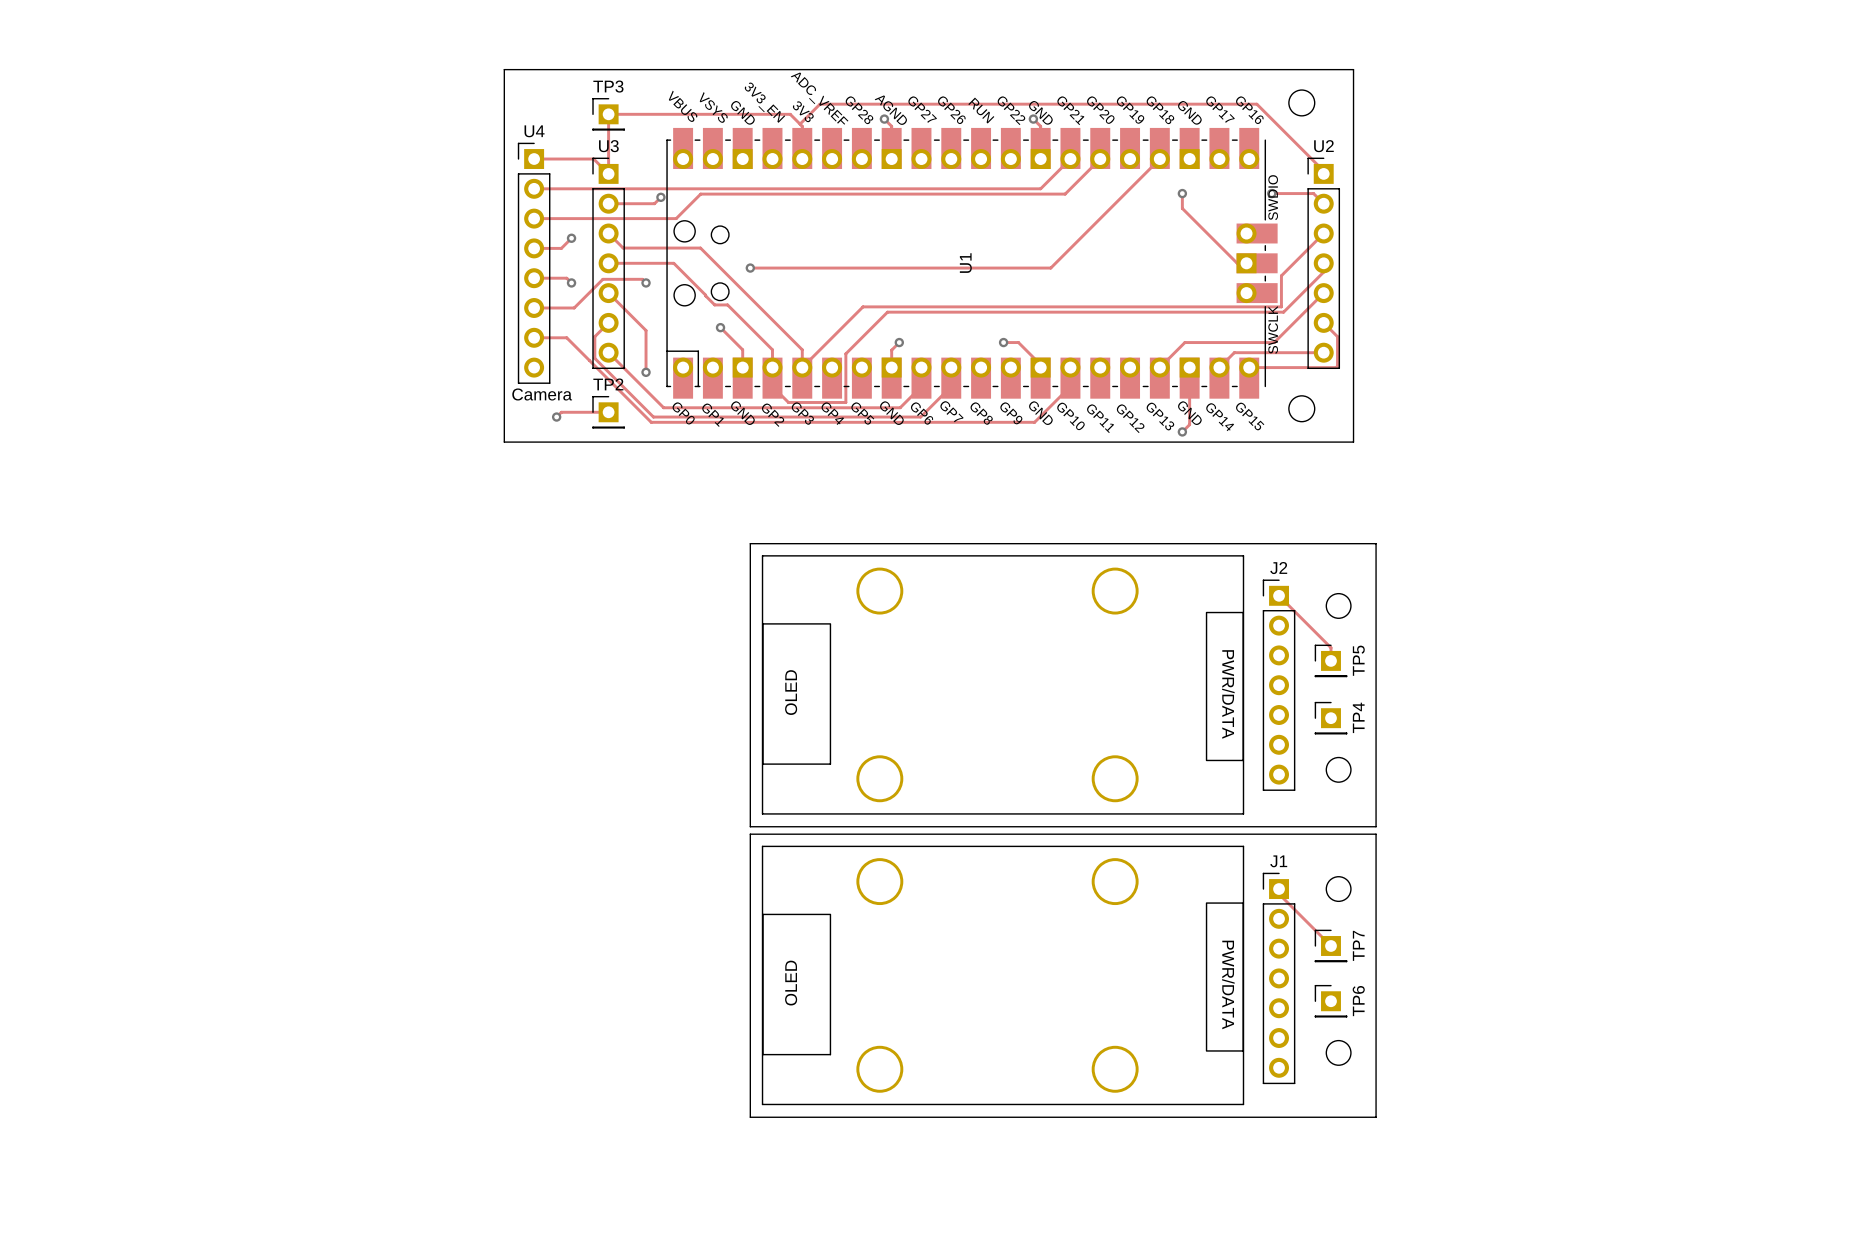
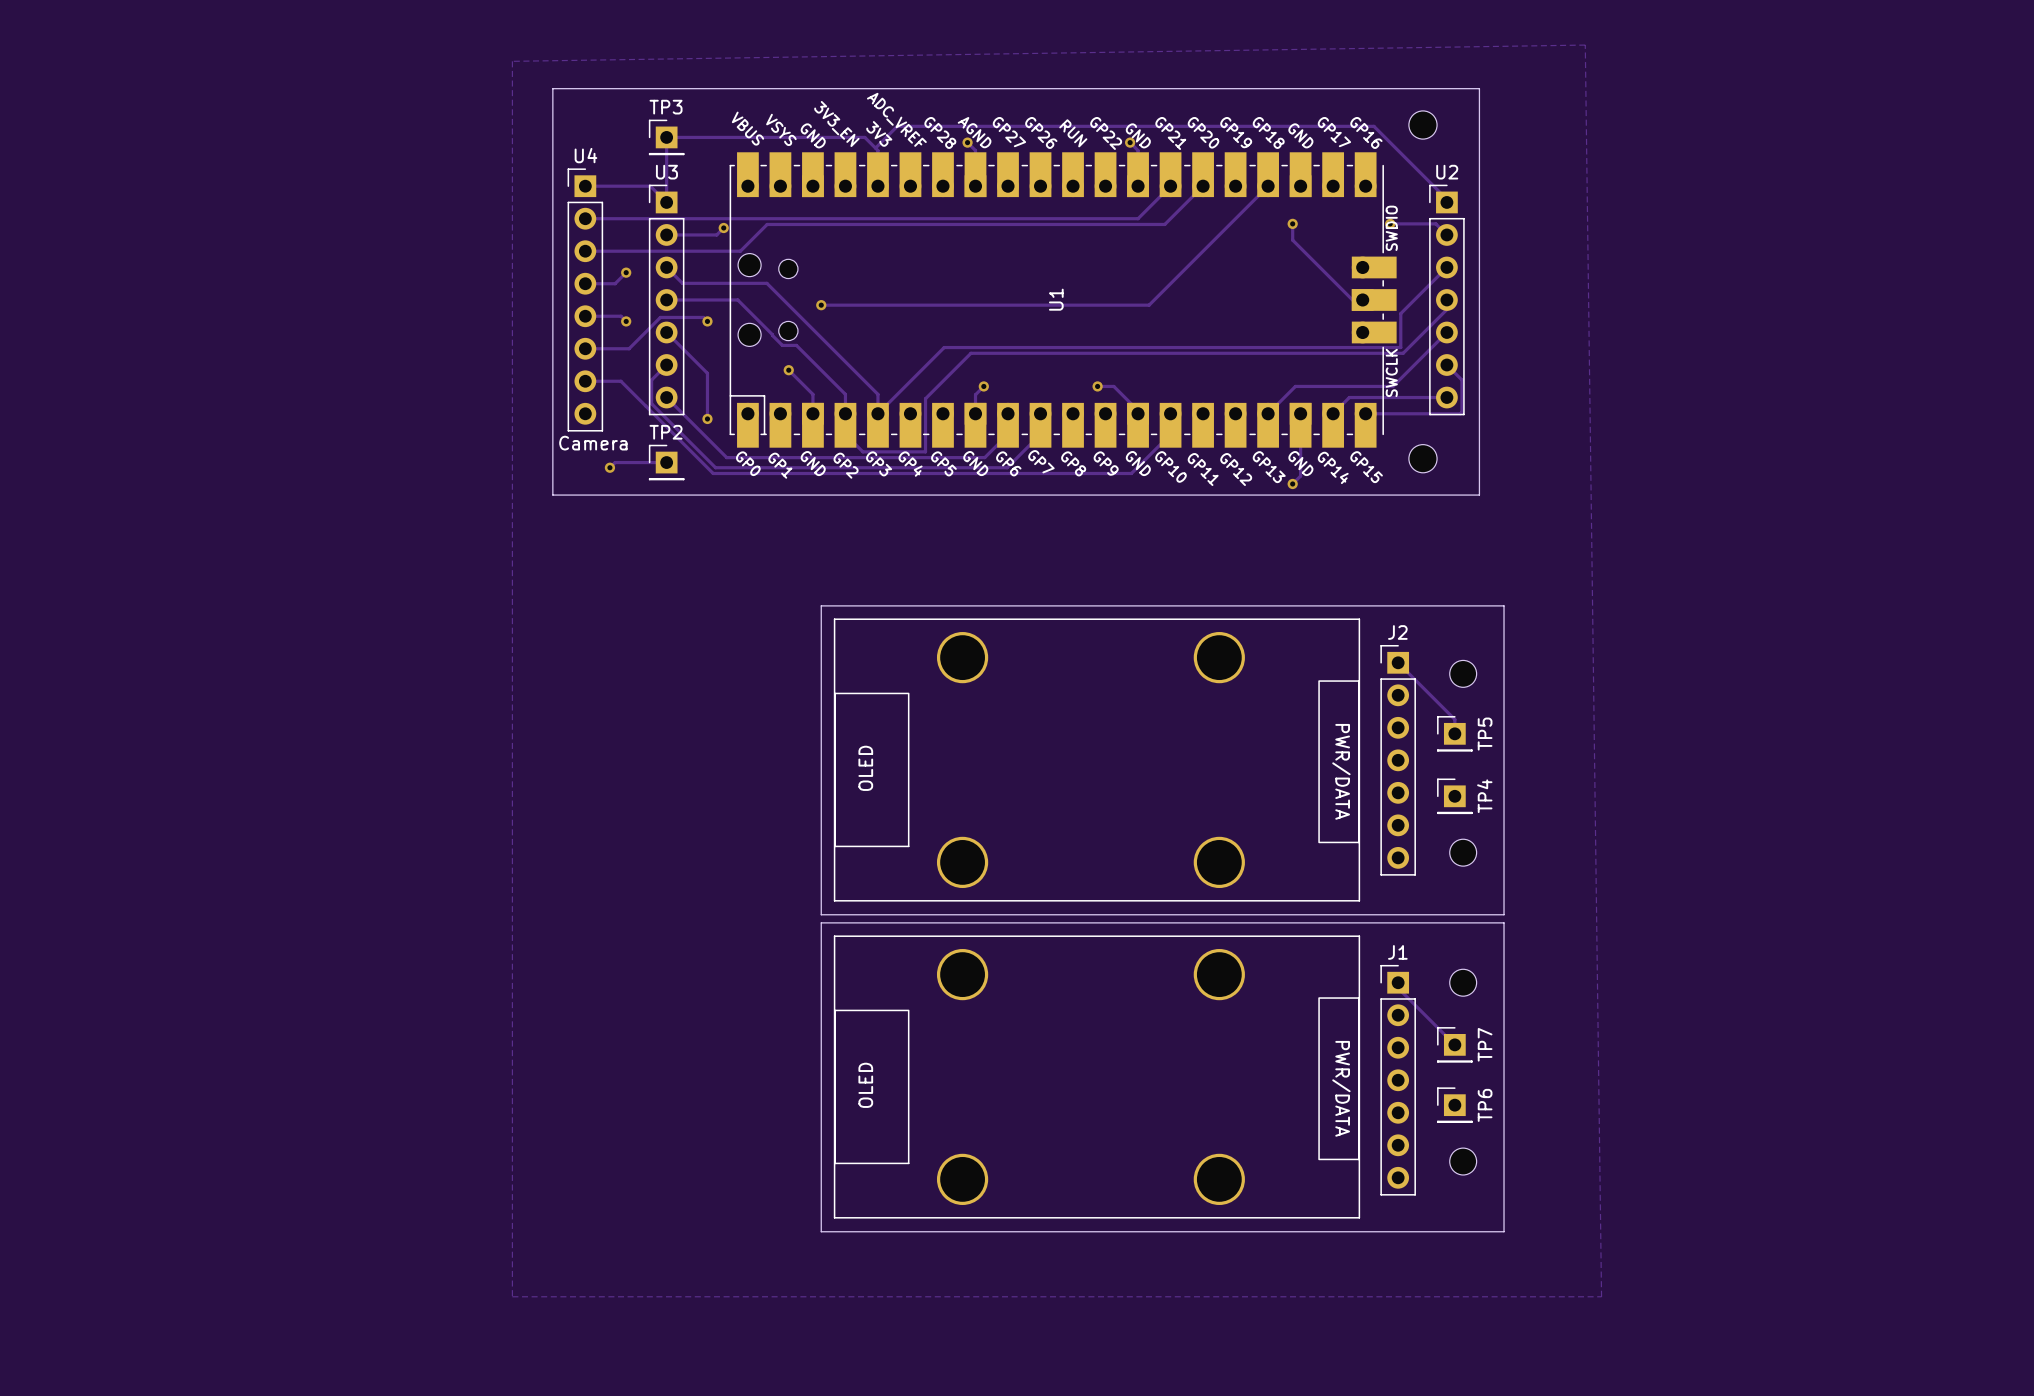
zone outline: none -> (1585, 45) (1601, 1296) (512, 1296) (512, 61) (1585, 45)

